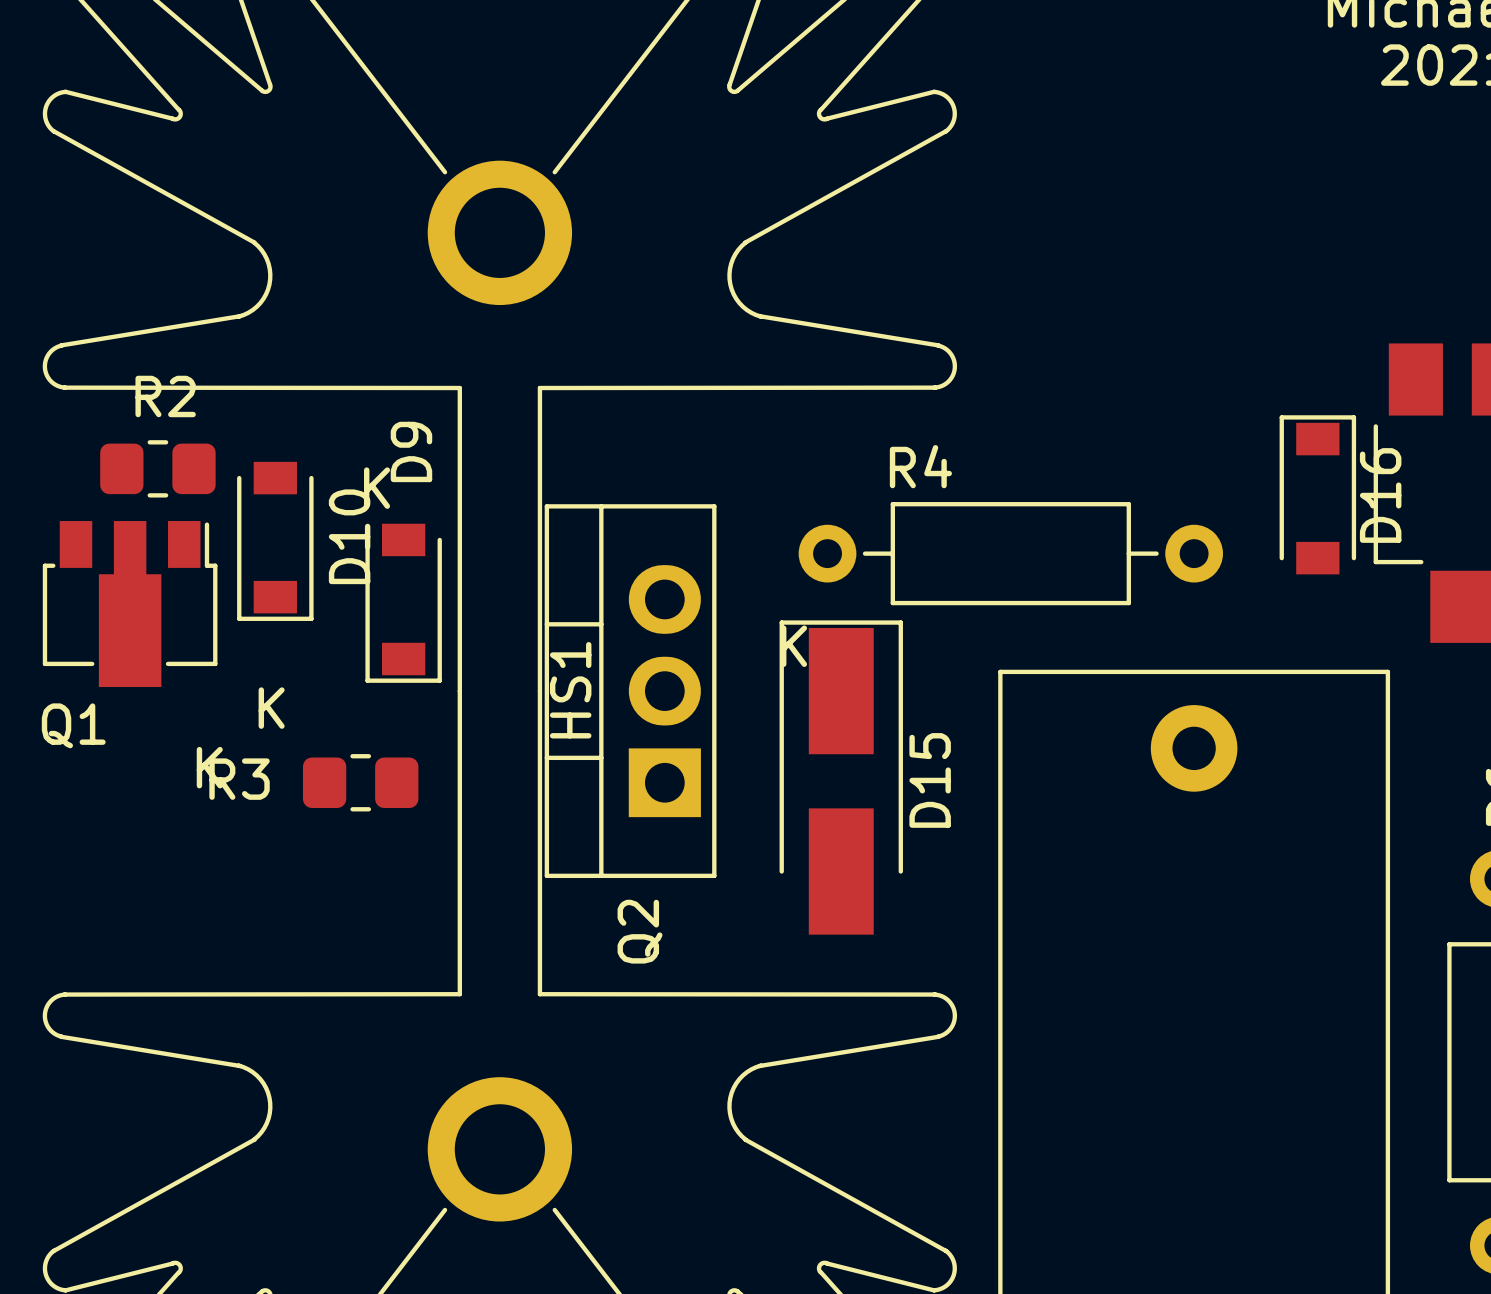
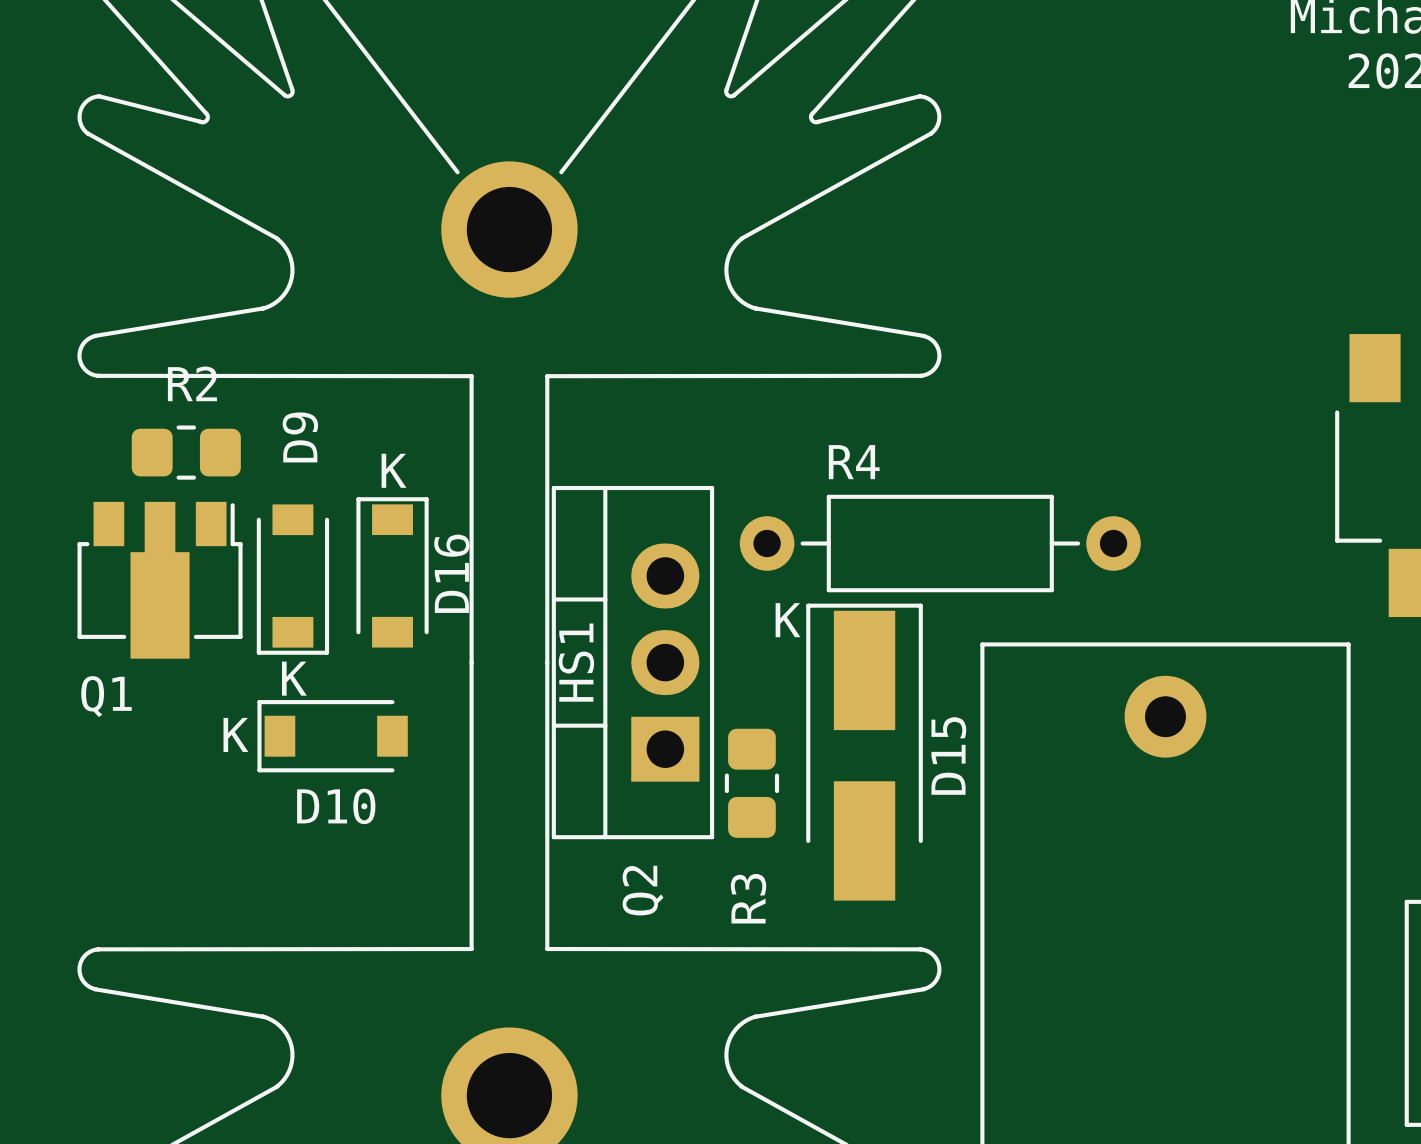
D16 position: (1317, 494) -> (392, 572)
D10 rotation: 0° (275, 541) -> 90° clockwise (332, 736)
D10 position: (275, 541) -> (332, 736)
R4 position: (1010, 553) -> (940, 543)
D9 position: (403, 603) -> (292, 579)
D15 position: (841, 777) -> (864, 752)
R3 name position: R3 (239, 779) -> R3 (748, 898)
R3 rotation: 0° (360, 782) -> 90° clockwise (751, 783)
R3 position: (360, 782) -> (751, 783)

